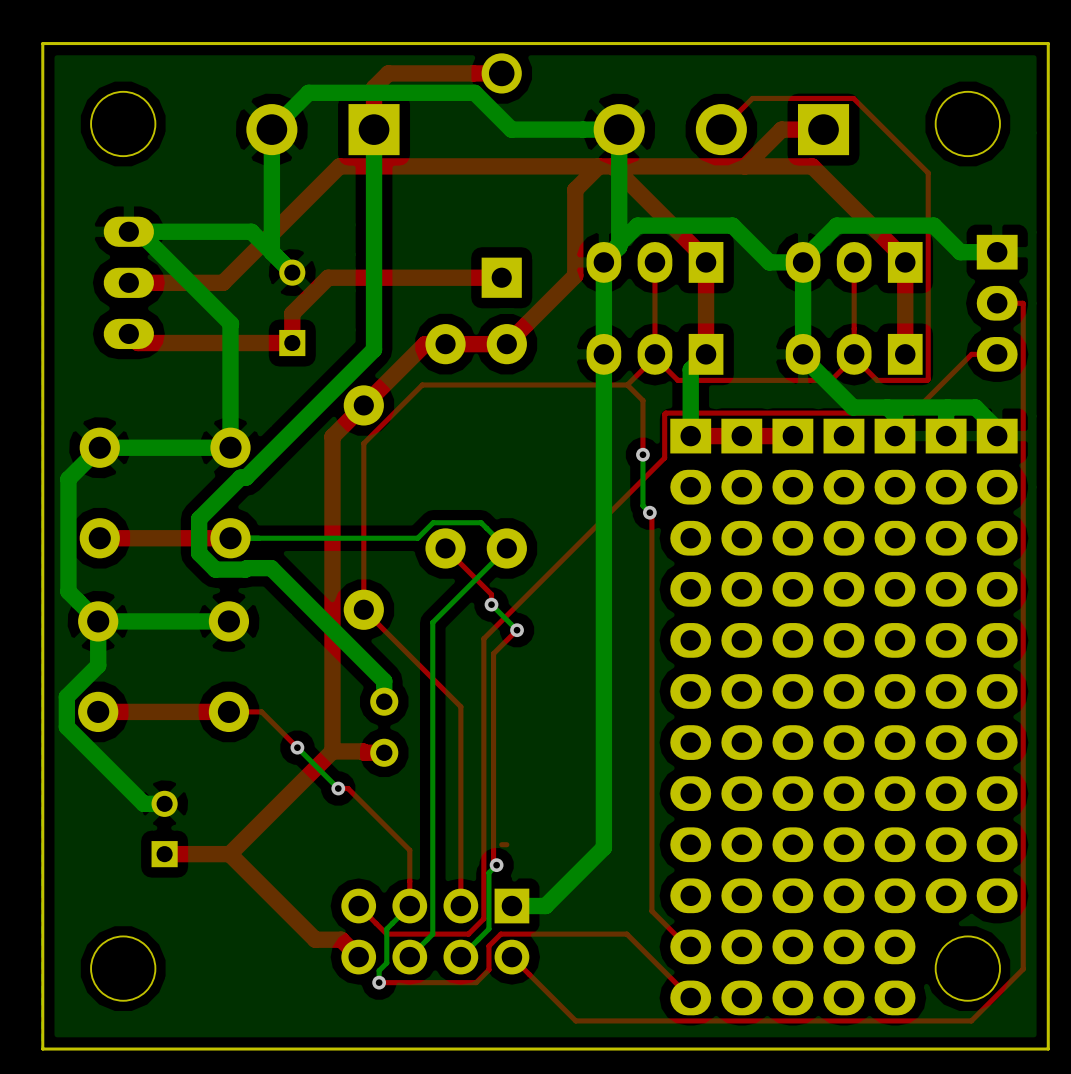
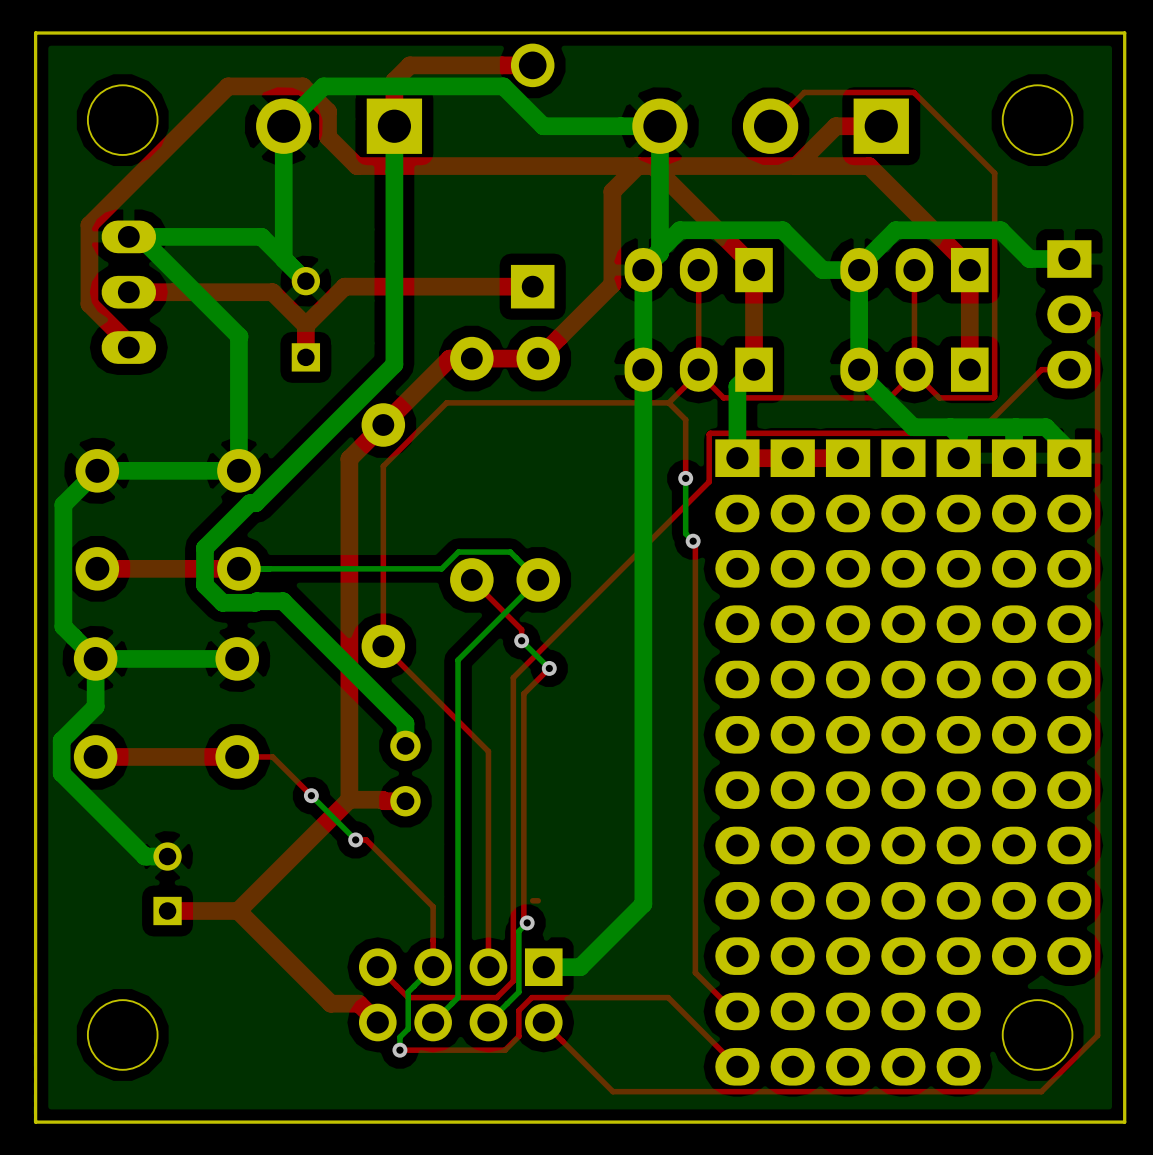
top track: (339, 166) (223, 282) -> (356, 166) (328, 137) (328, 111) (302, 86) (228, 86) (89, 225) (89, 304) (128, 343)
top track: none -> (230, 292) (272, 292) (305, 325)
top track: (128, 333) (137, 343) (292, 343) -> none

